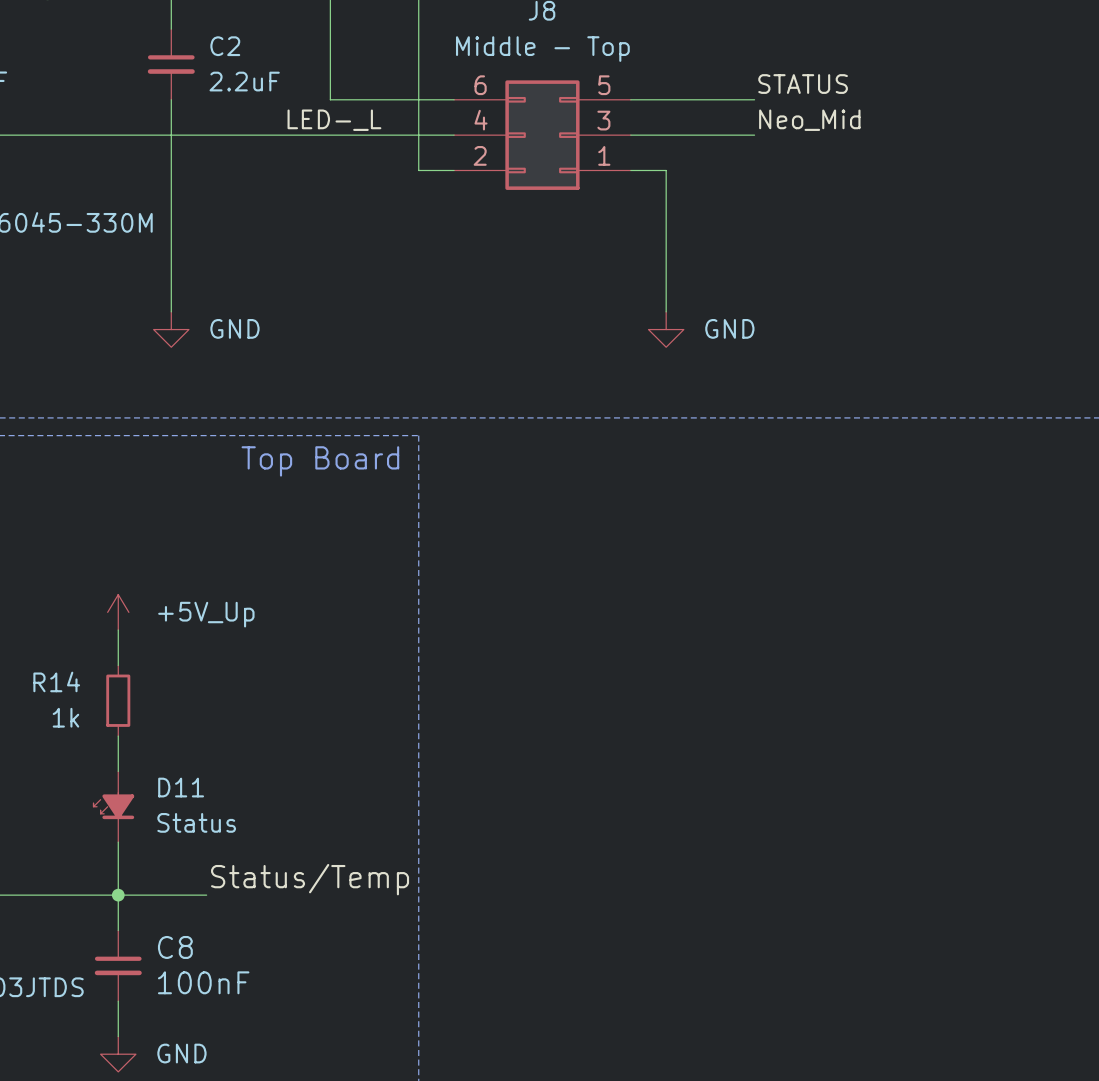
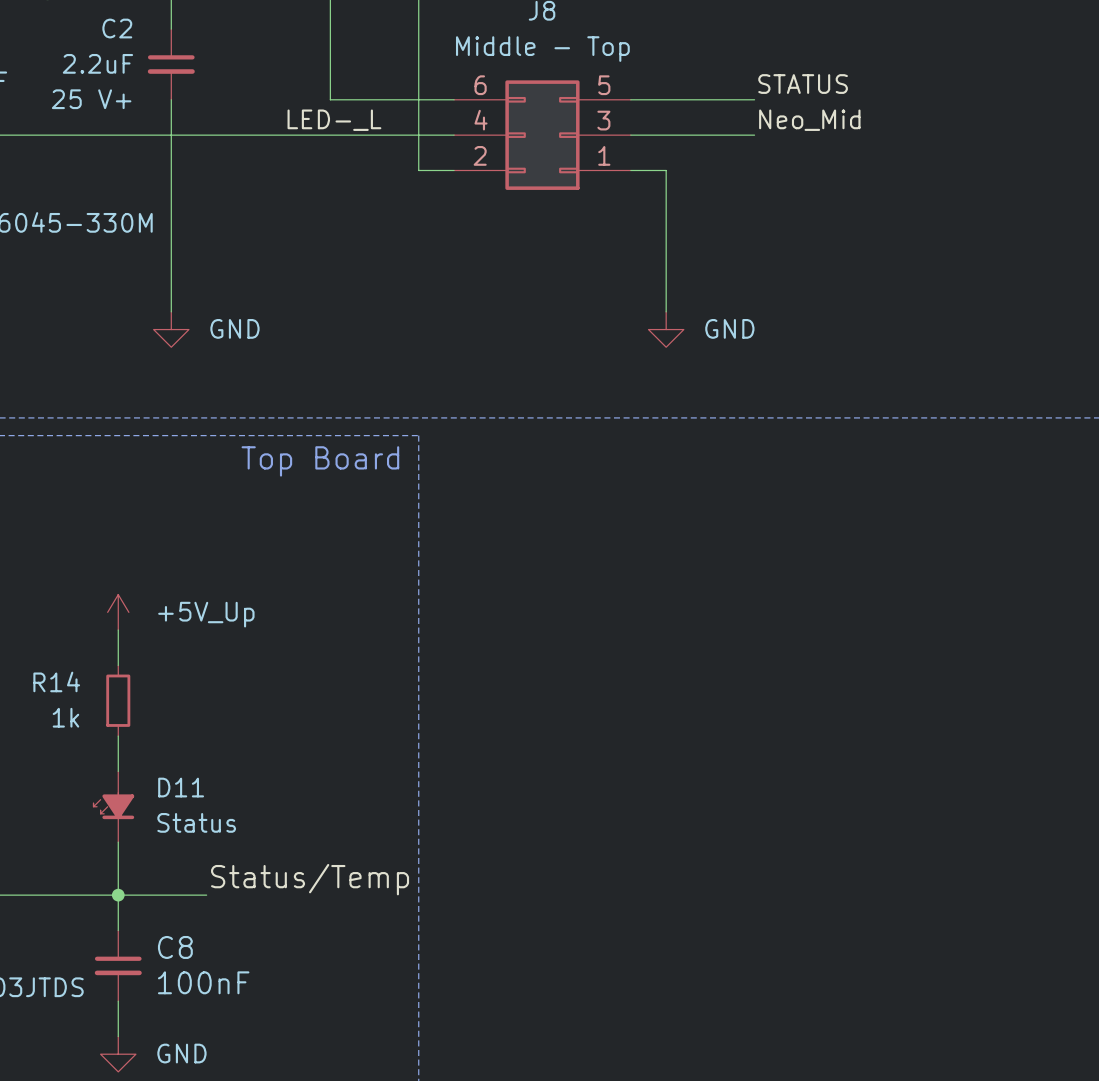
C2 name position: C2 (225, 46) -> C2 (117, 28)
C2 value position: 2.2uF (244, 81) -> 2.2uF (97, 63)
C2 text: none -> 25 V+ (91, 99)

